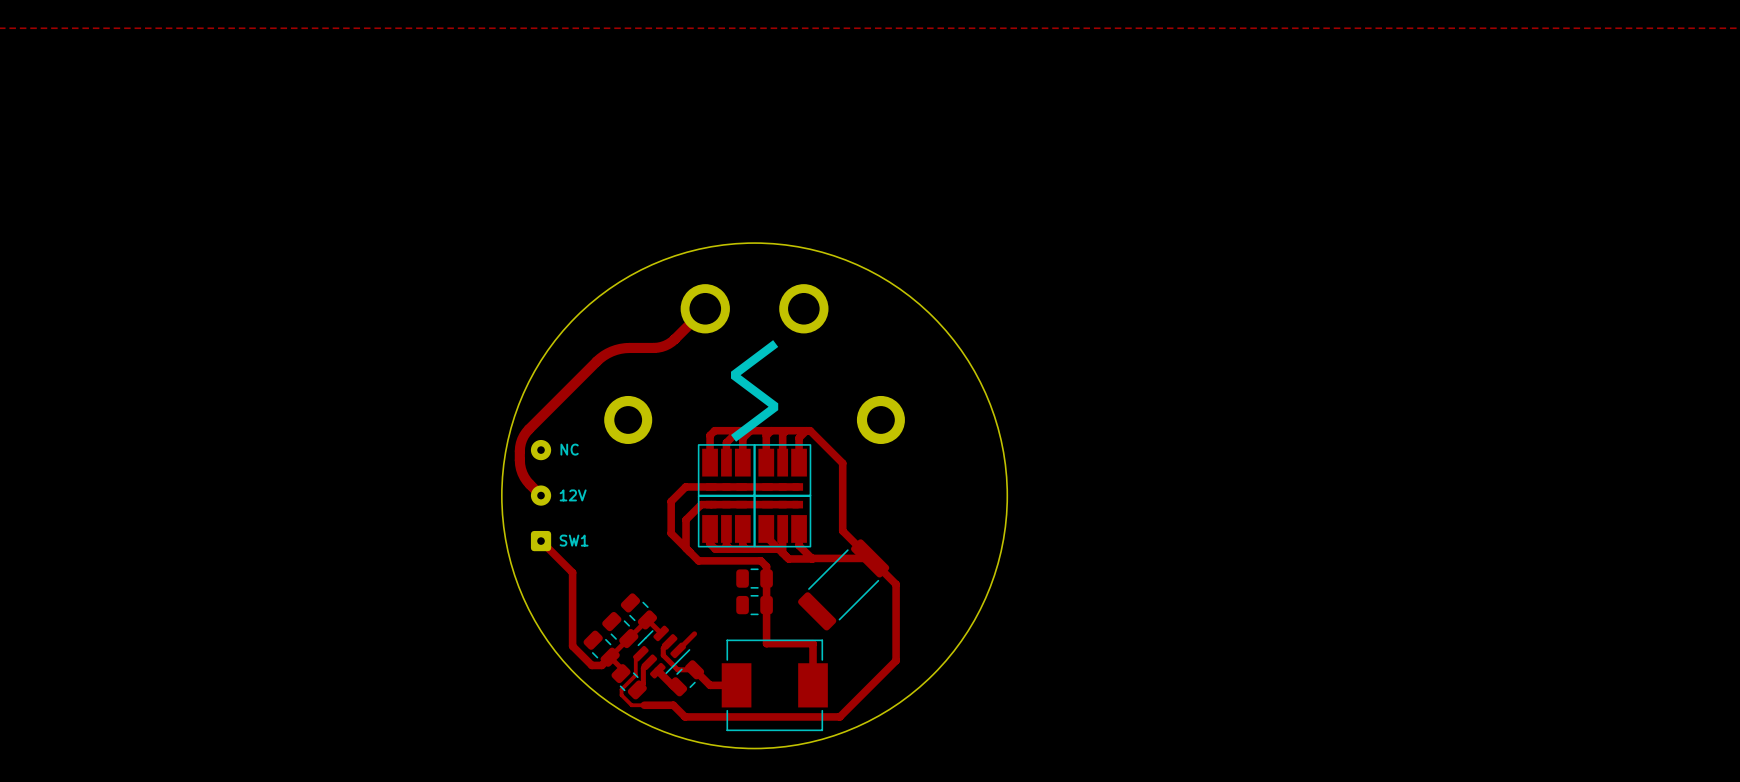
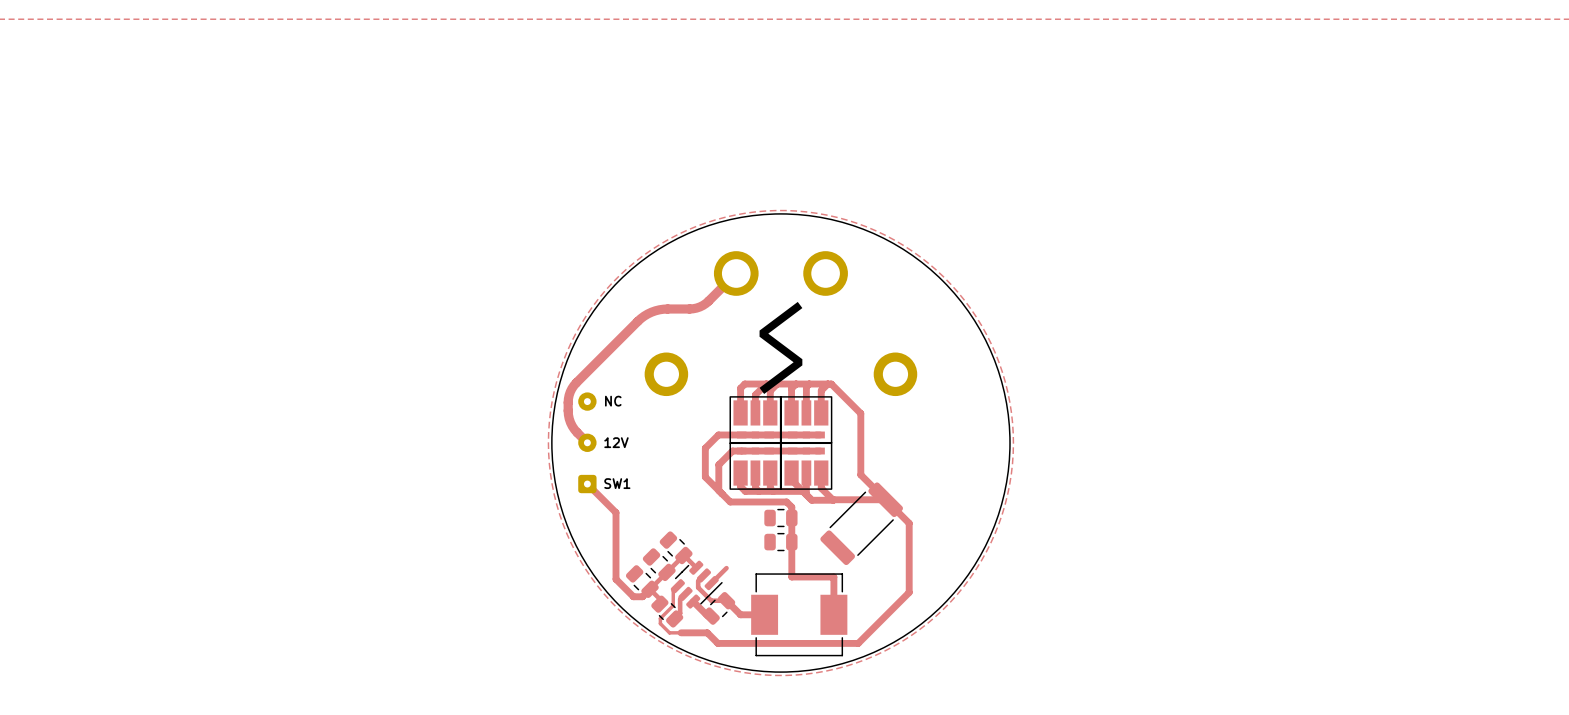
top zone outline: none -> (775, 210) (826, 215) (866, 226) (911, 250) (943, 276) (970, 308) (991, 343) (1007, 391) (1013, 432) (1009, 483) (999, 523) (981, 560) (950, 601) (920, 629) (875, 655) (836, 668) (786, 675) (734, 670) (695, 659) (650, 635) (618, 609) (591, 577) (570, 542) (554, 494) (548, 453) (552, 402) (562, 362) (580, 325) (611, 284) (641, 256) (686, 230) (724, 217) (775, 210)

